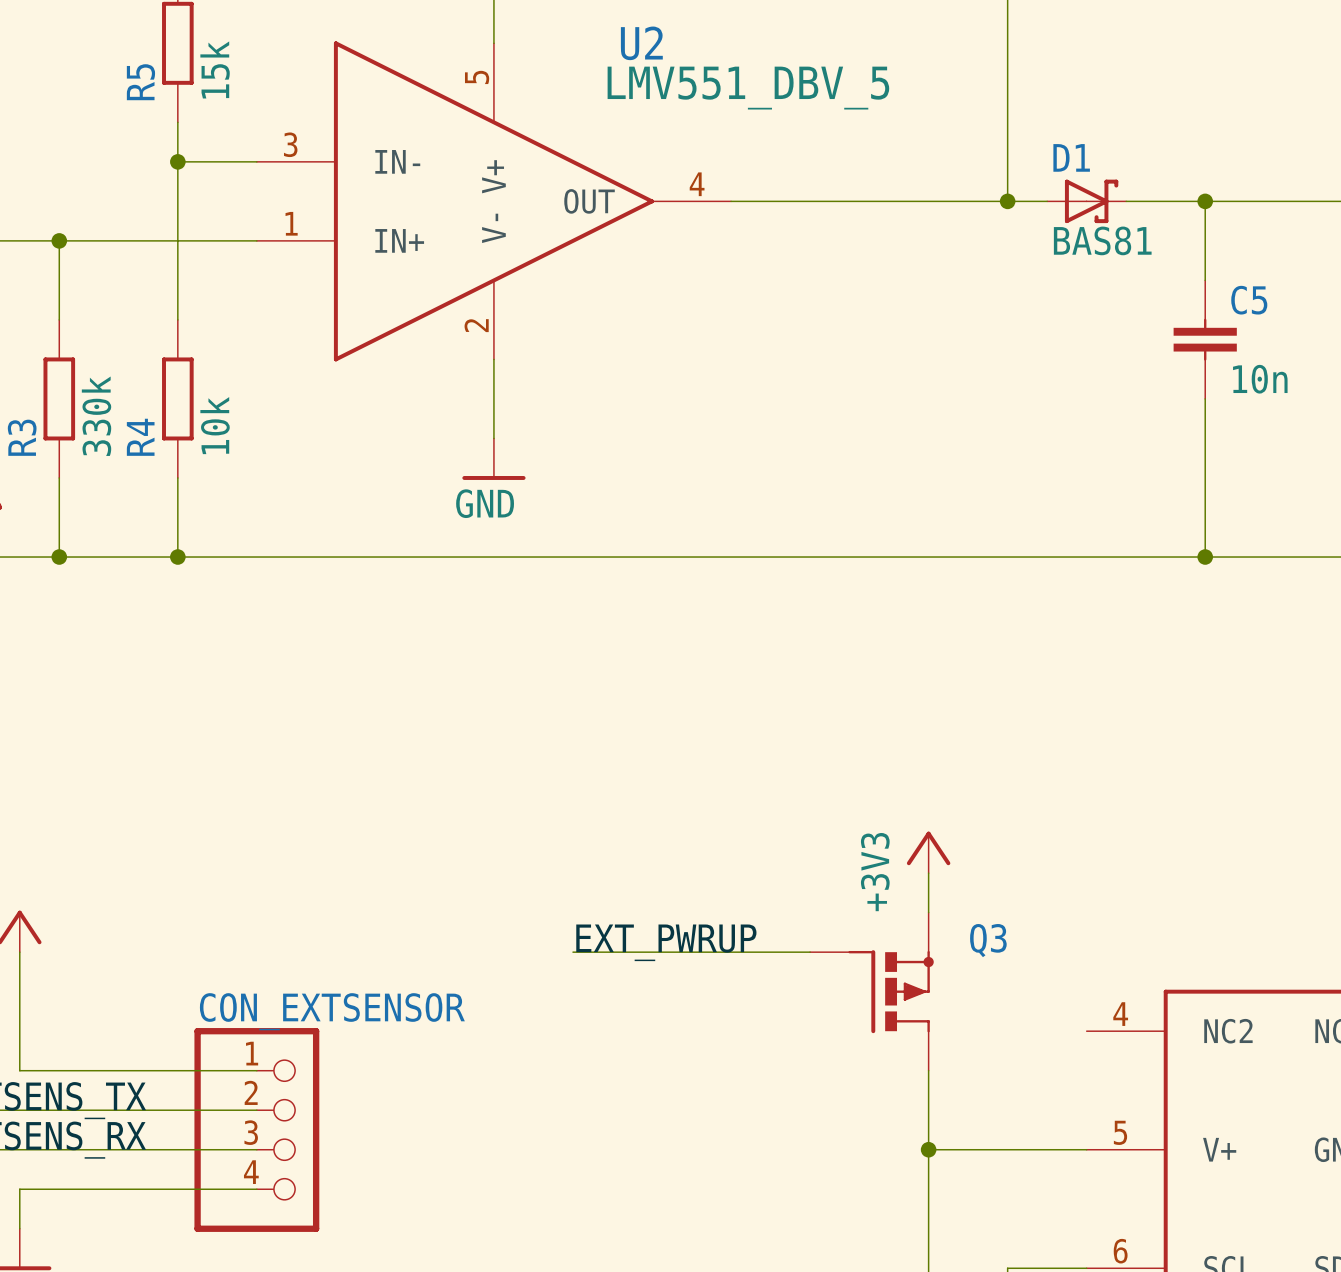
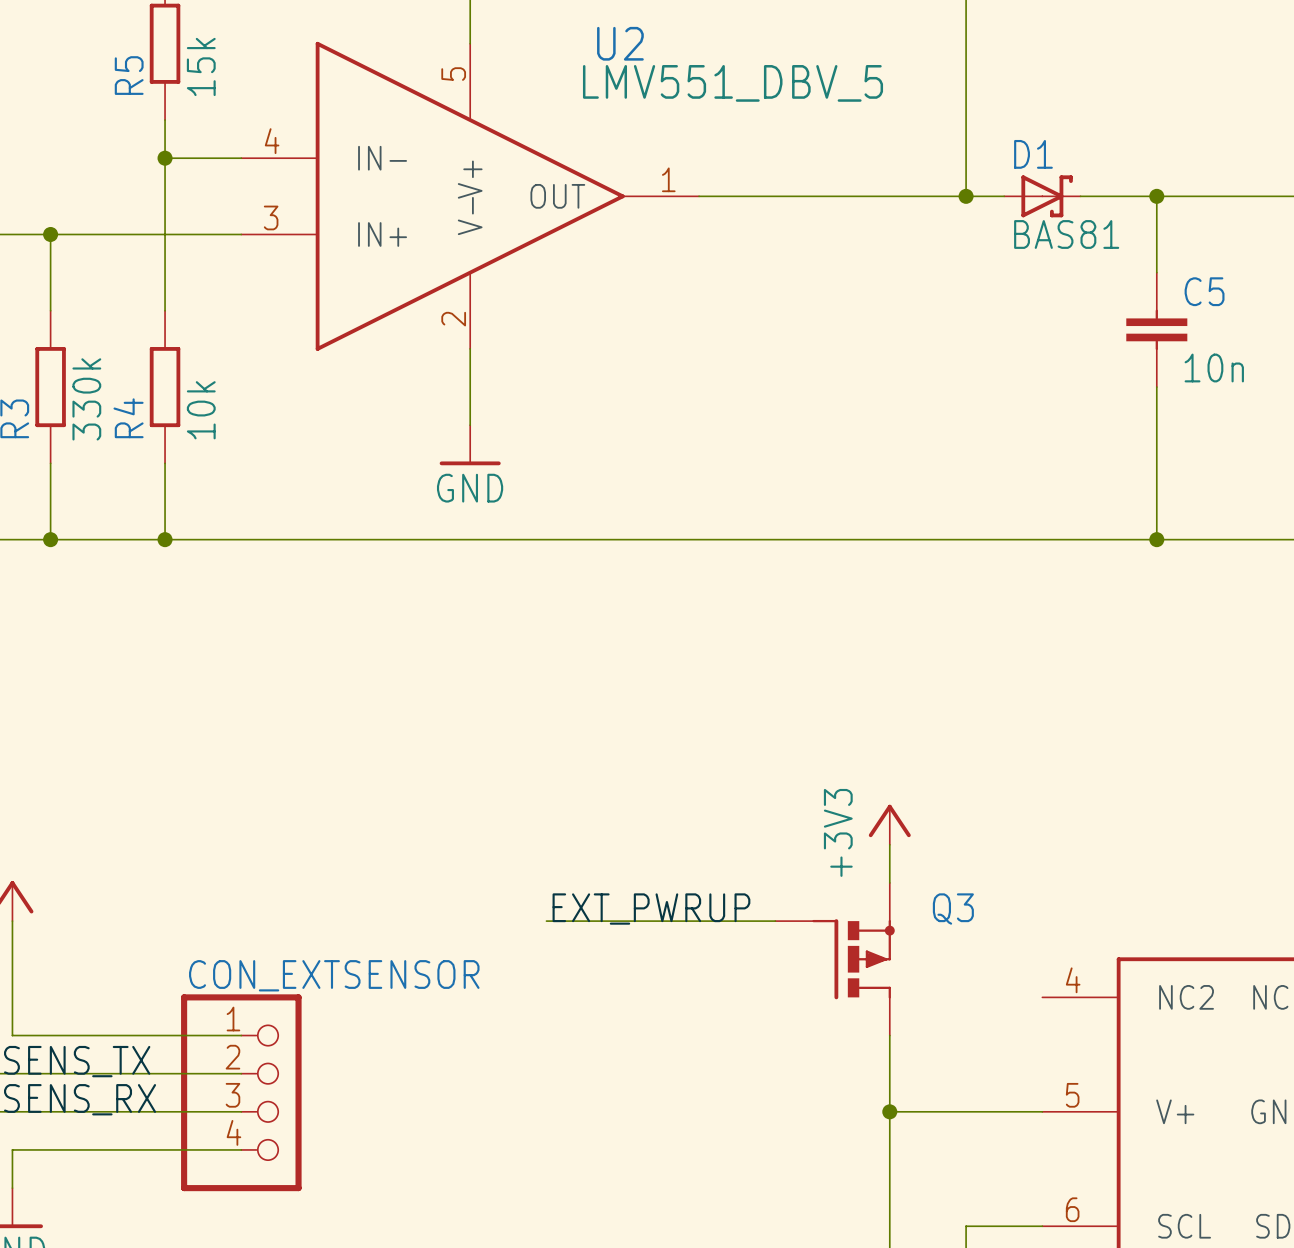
U2 pin number: 3 (290, 144) -> 4 (272, 141)
U2 pin number: 4 (697, 184) -> 1 (668, 179)
U2 pin number: 1 (291, 223) -> 3 (271, 217)

